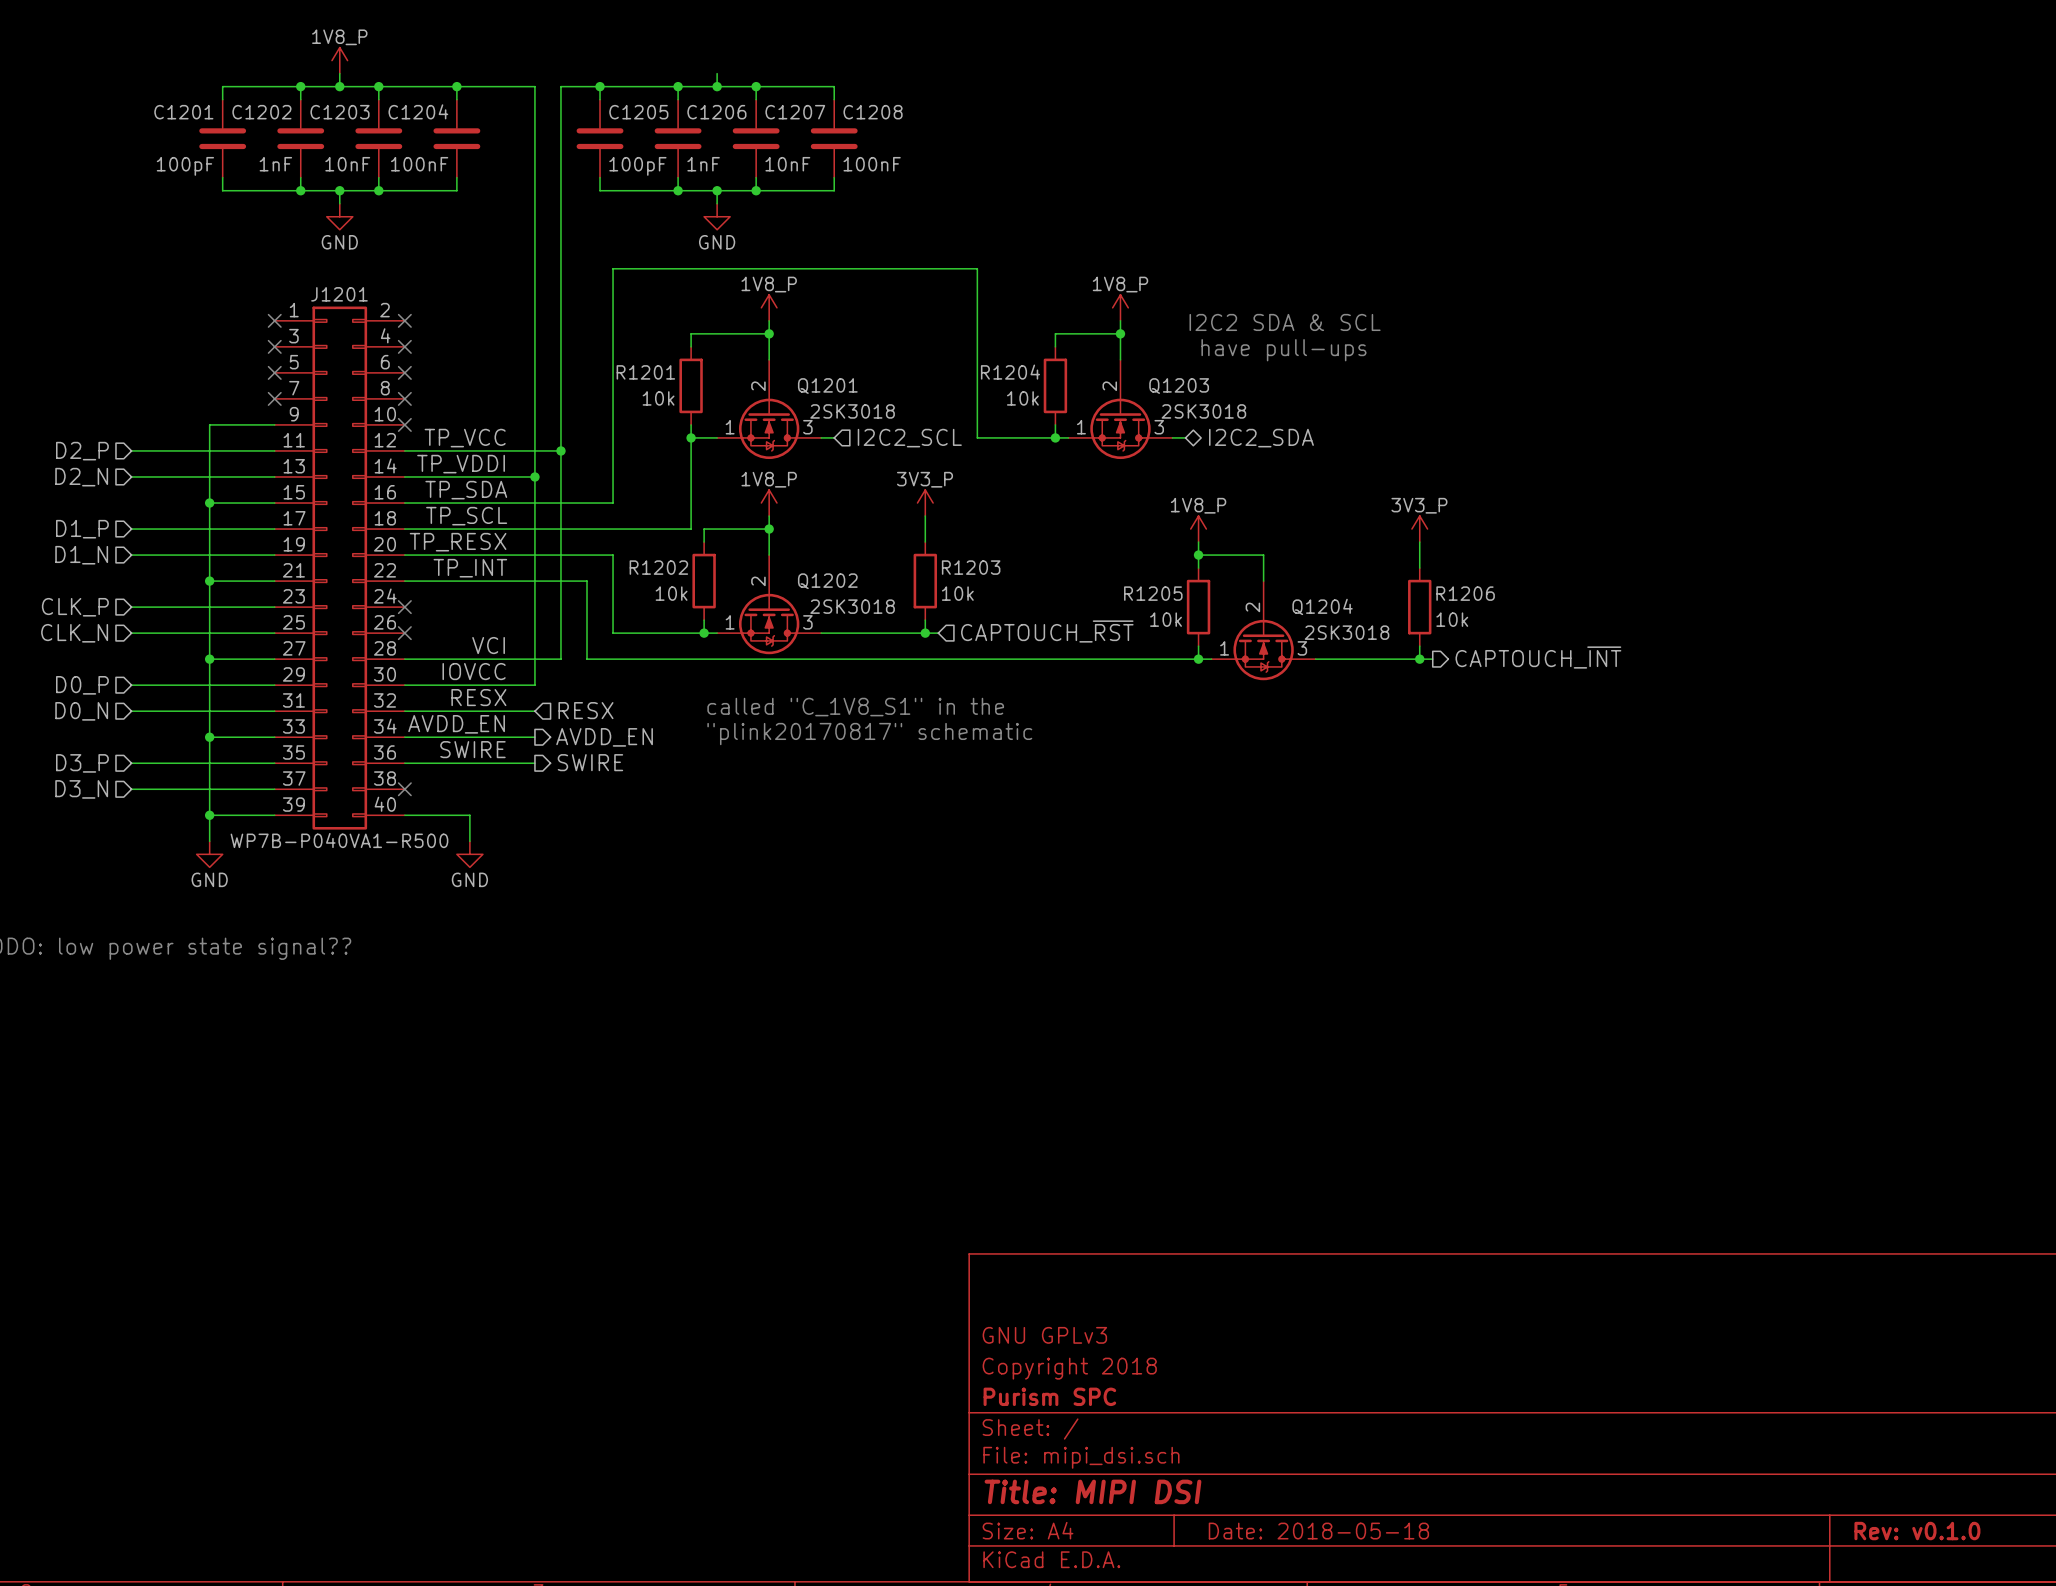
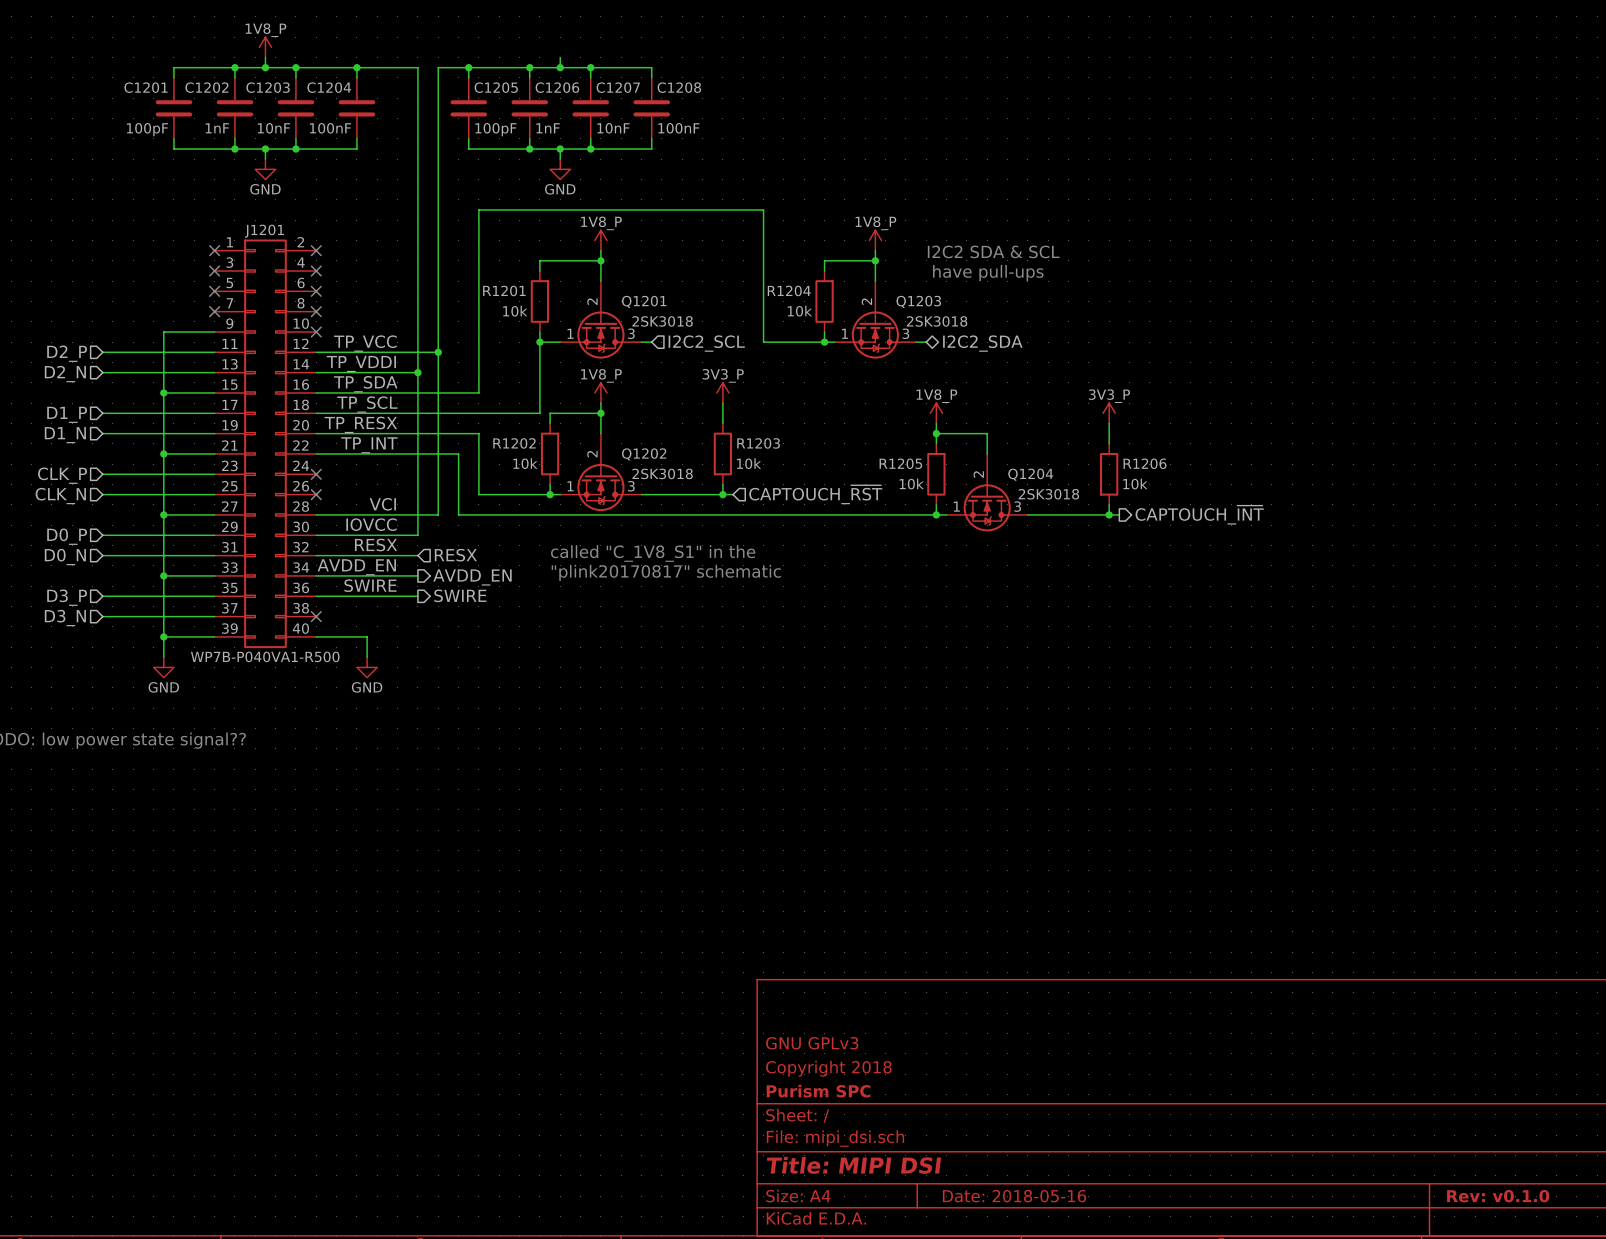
title block: Date: 2018-05-18 (1318, 1531) -> Date: 2018-05-16 (1014, 1196)

